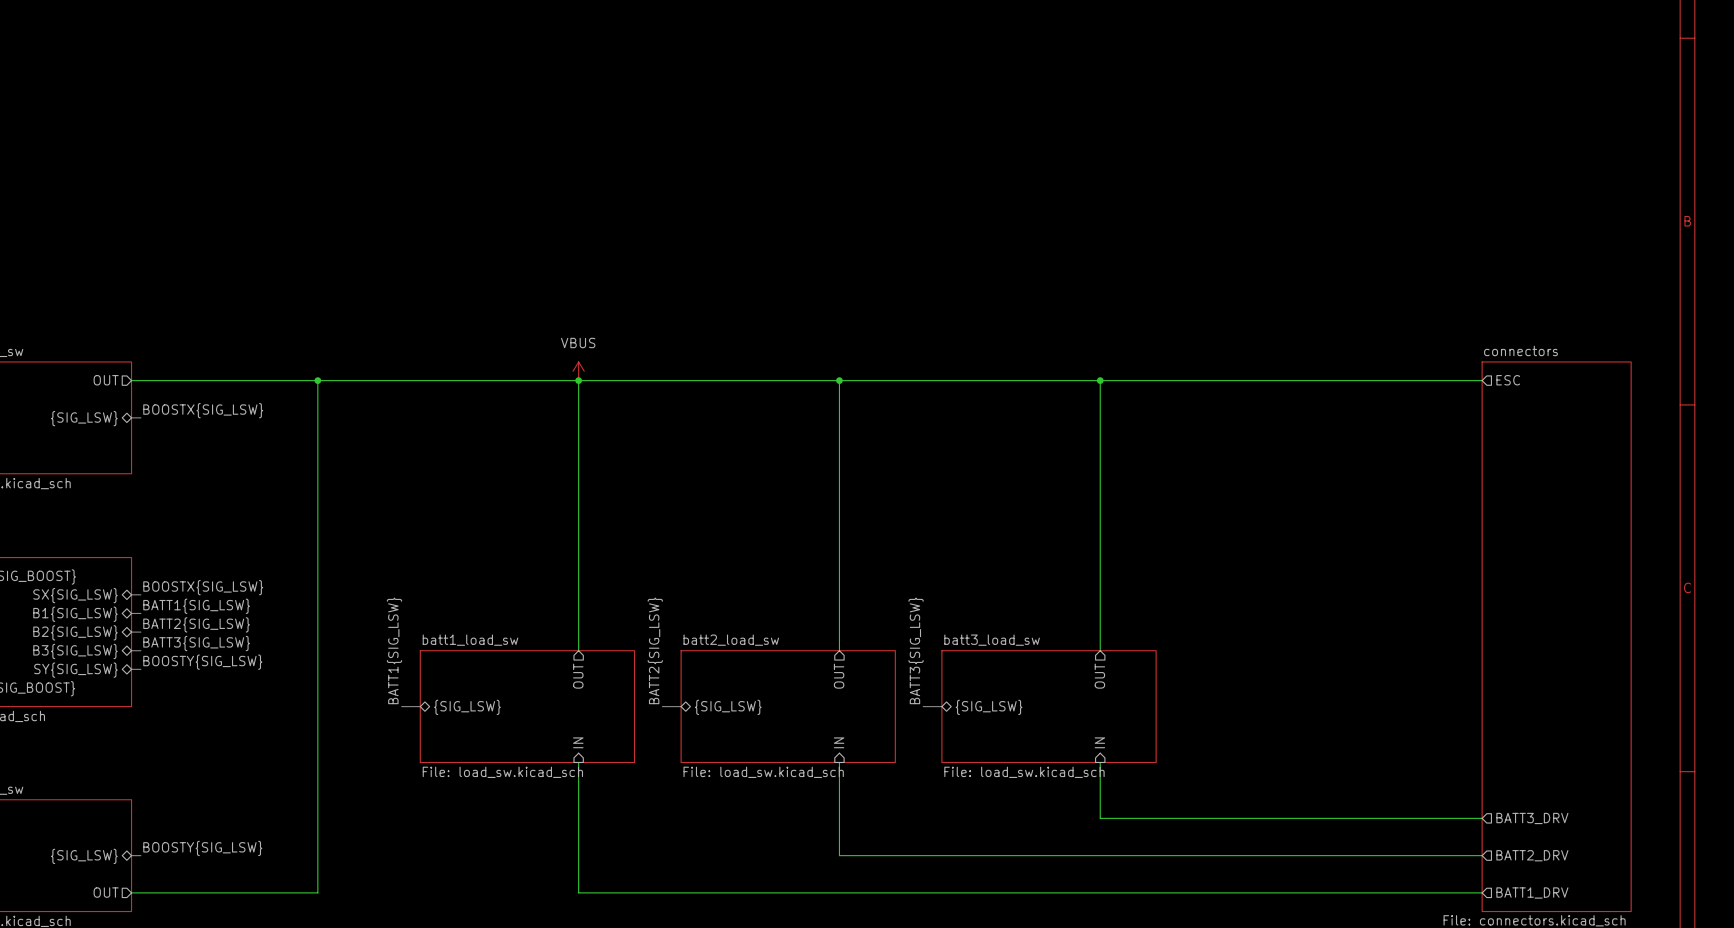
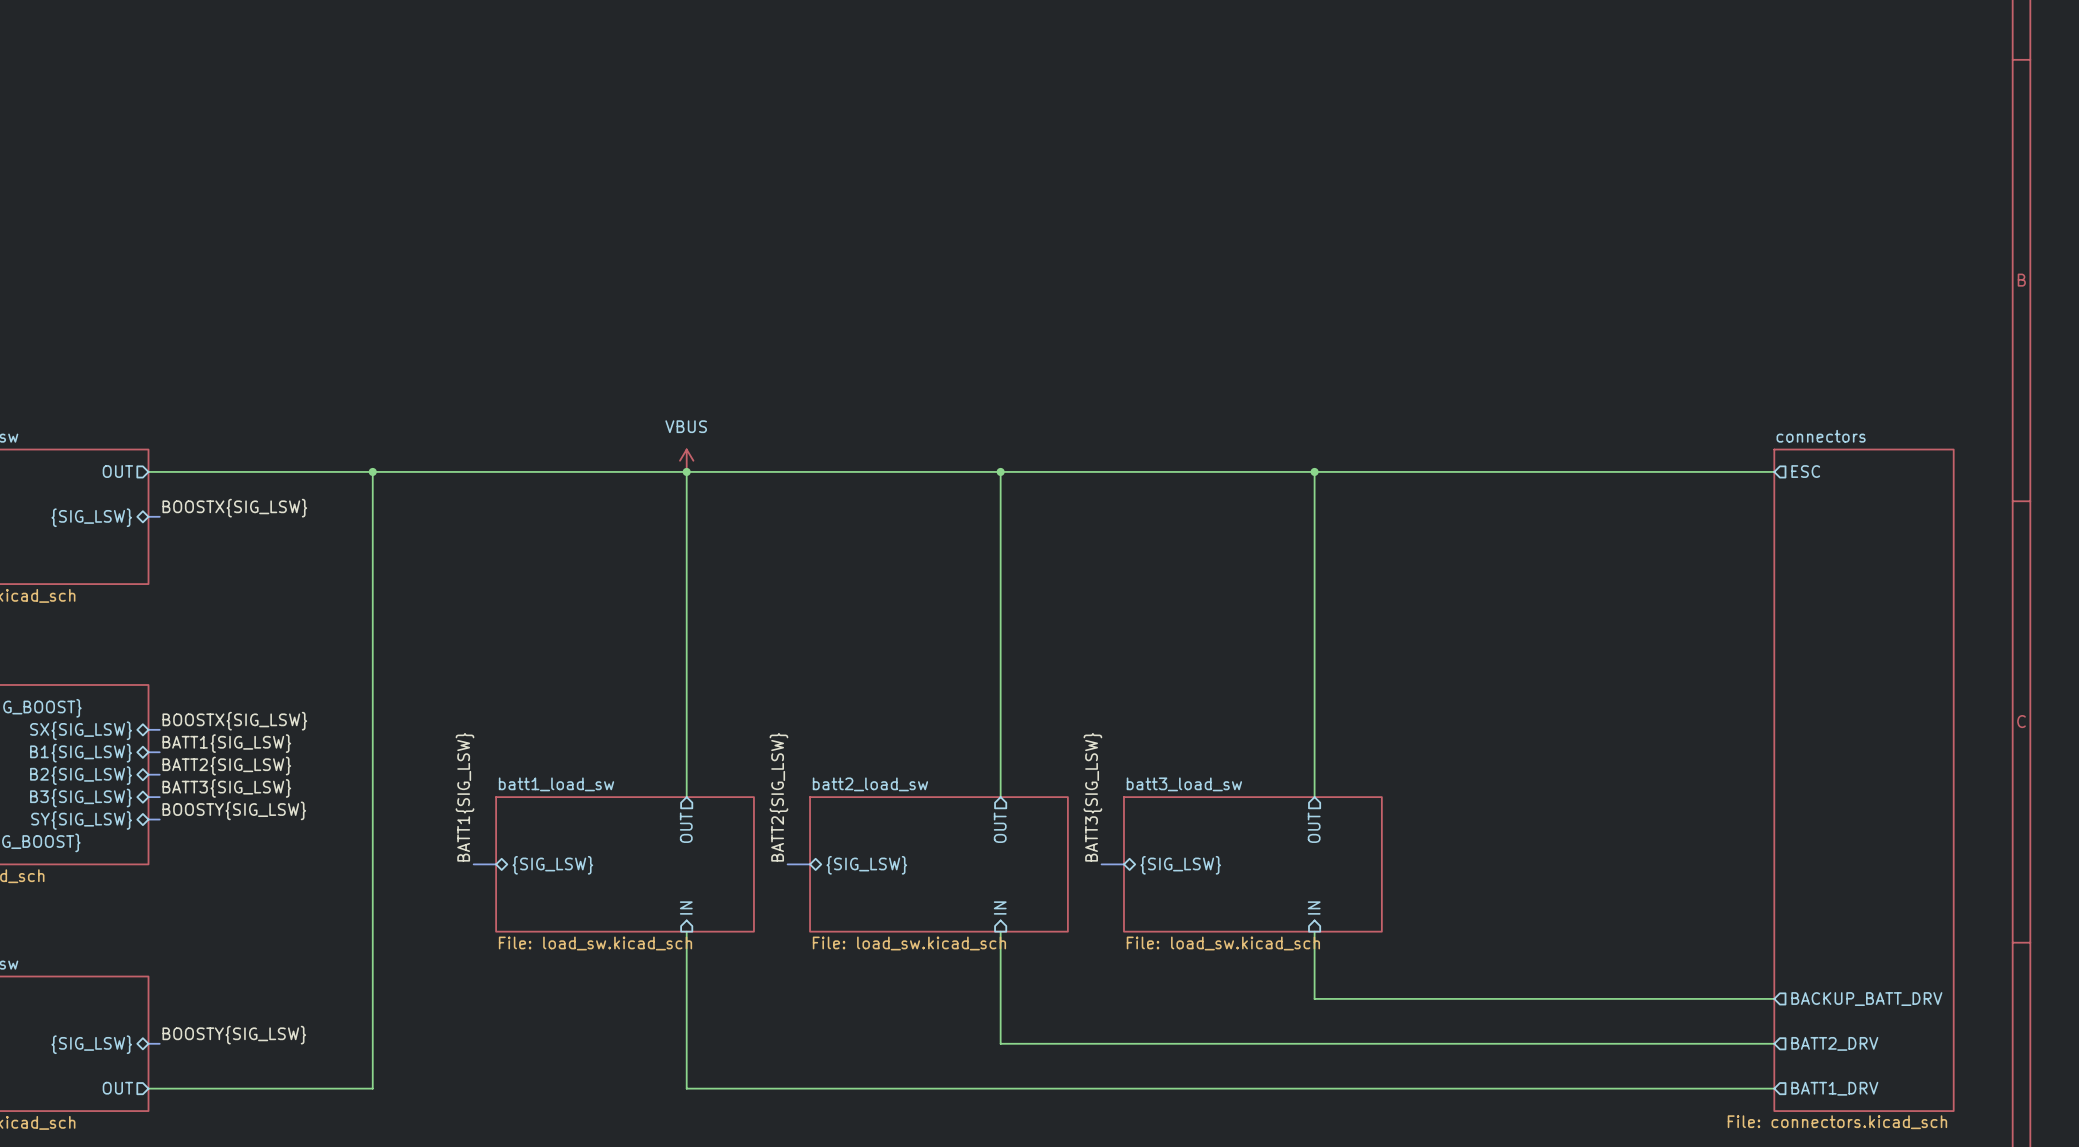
sheet pin: BATT3_DRV (1532, 818) -> BACKUP_BATT_DRV (1866, 999)

